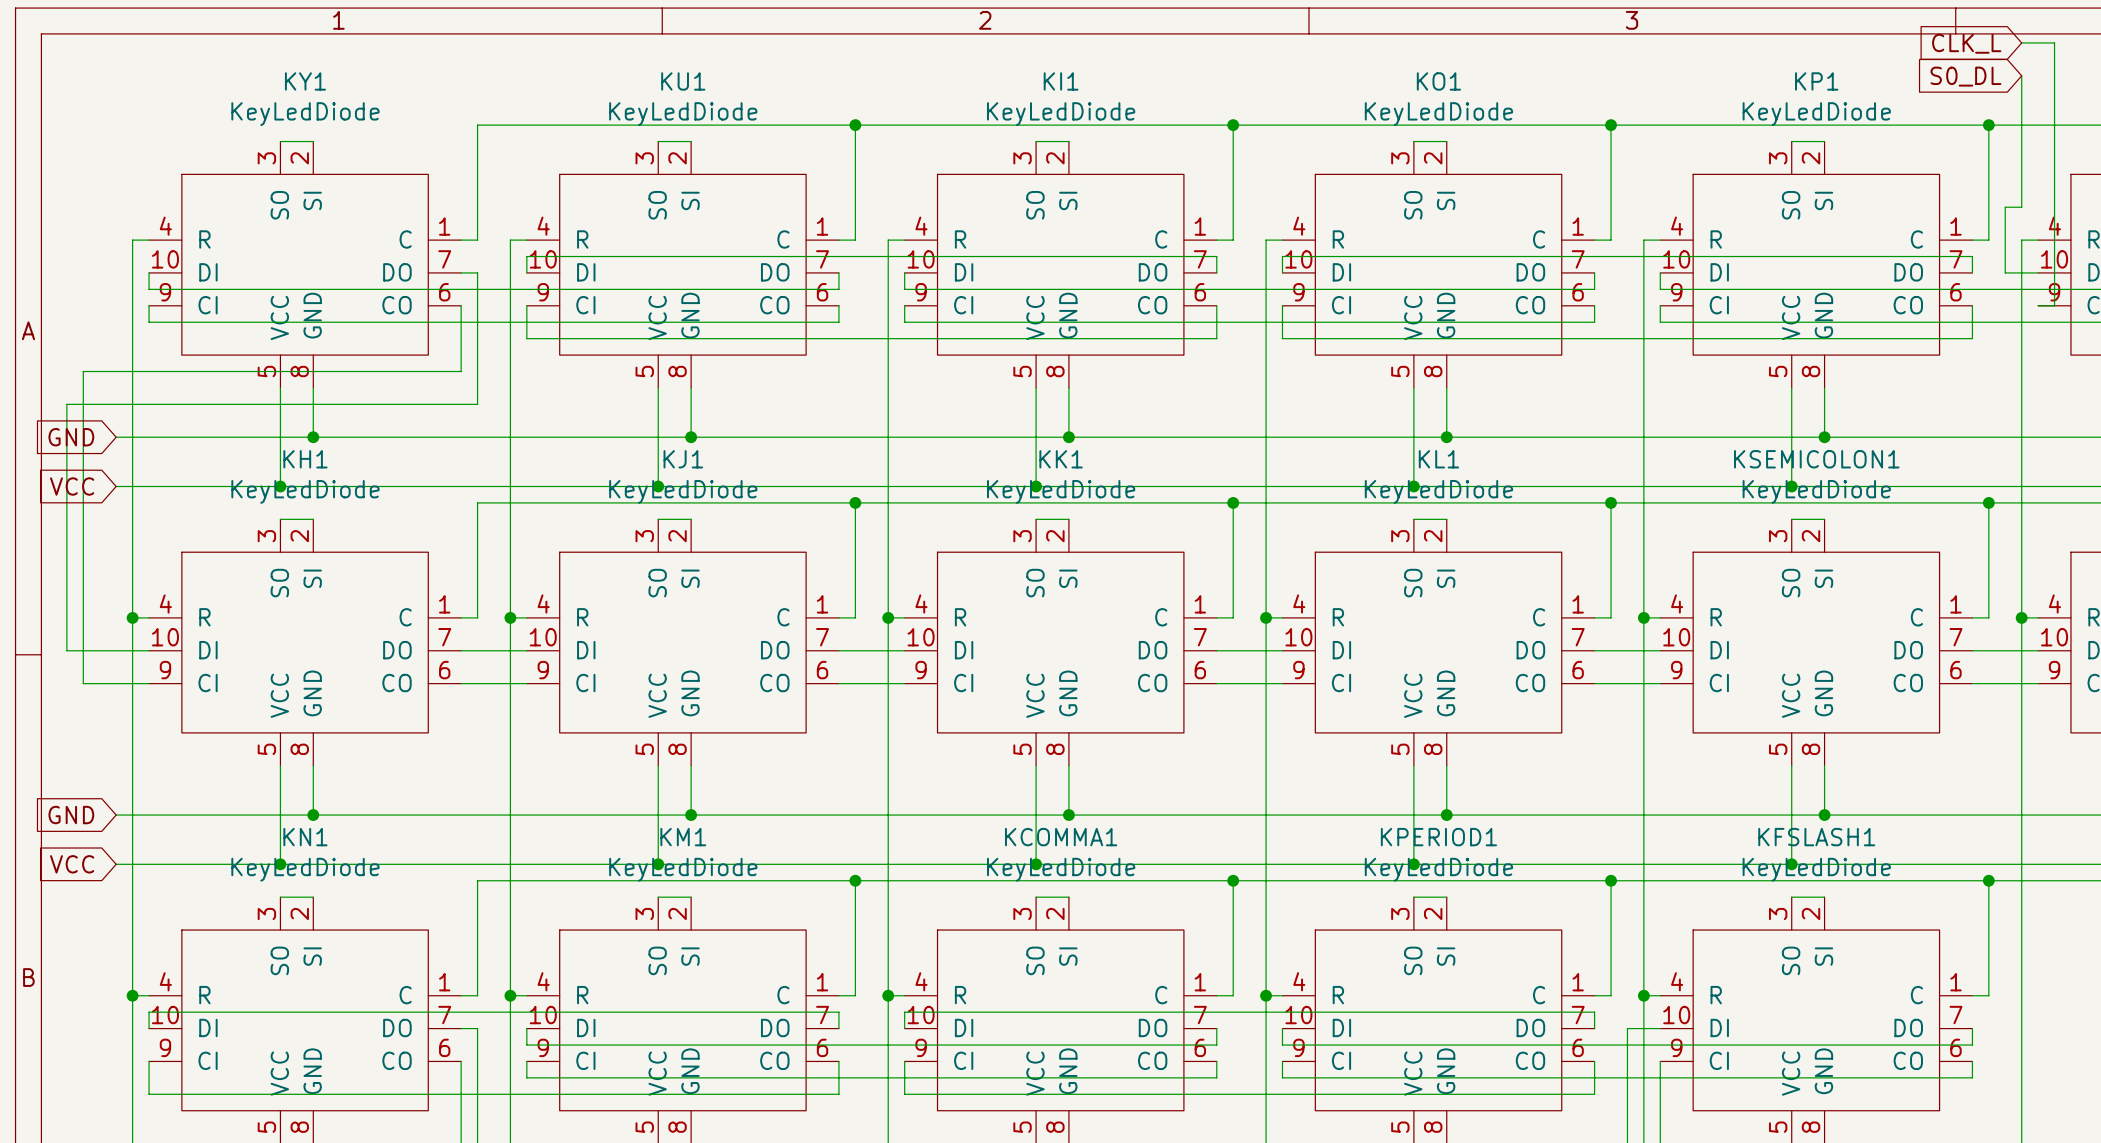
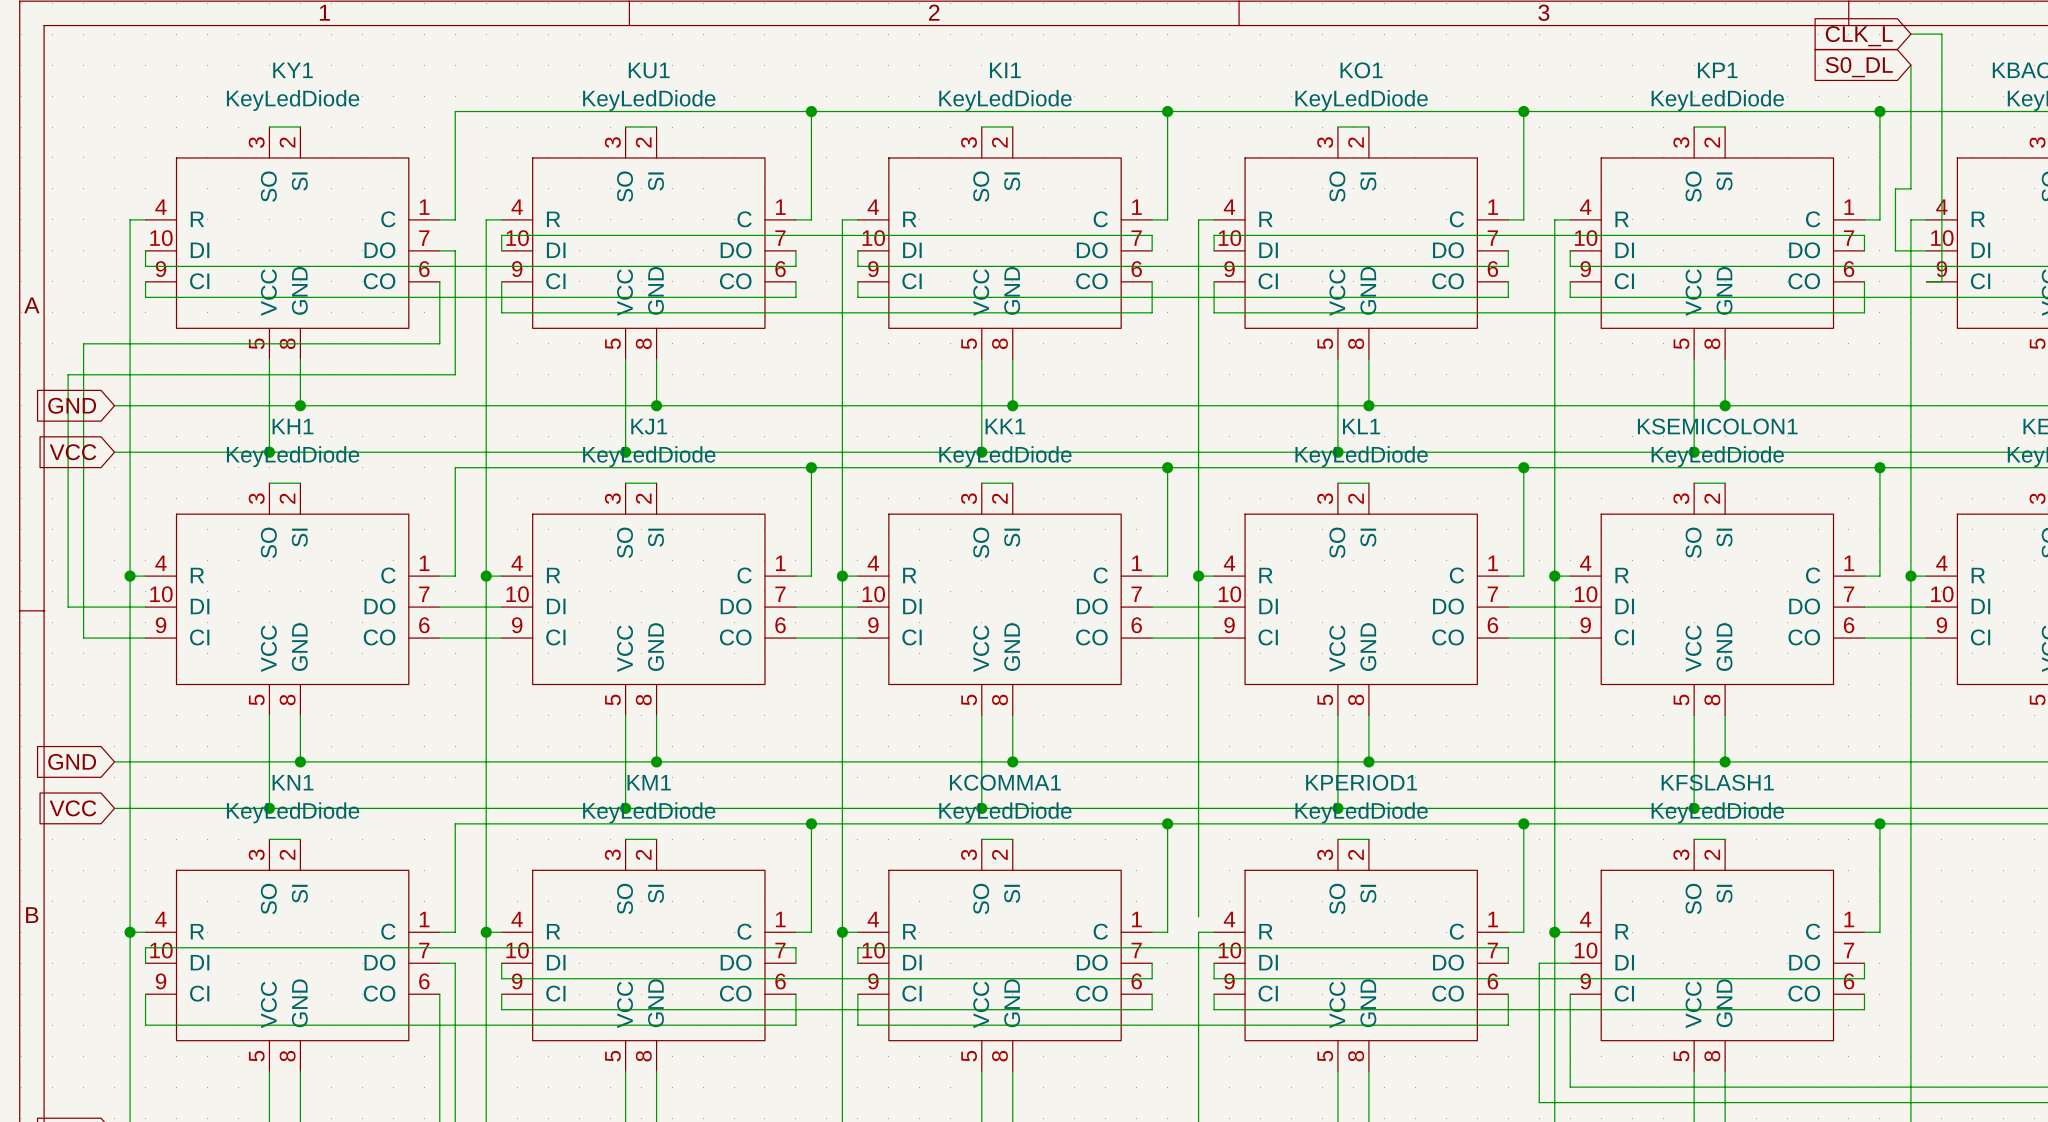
wire: (1266, 979) (1266, 995) -> none
junction: (1266, 995) -> none

